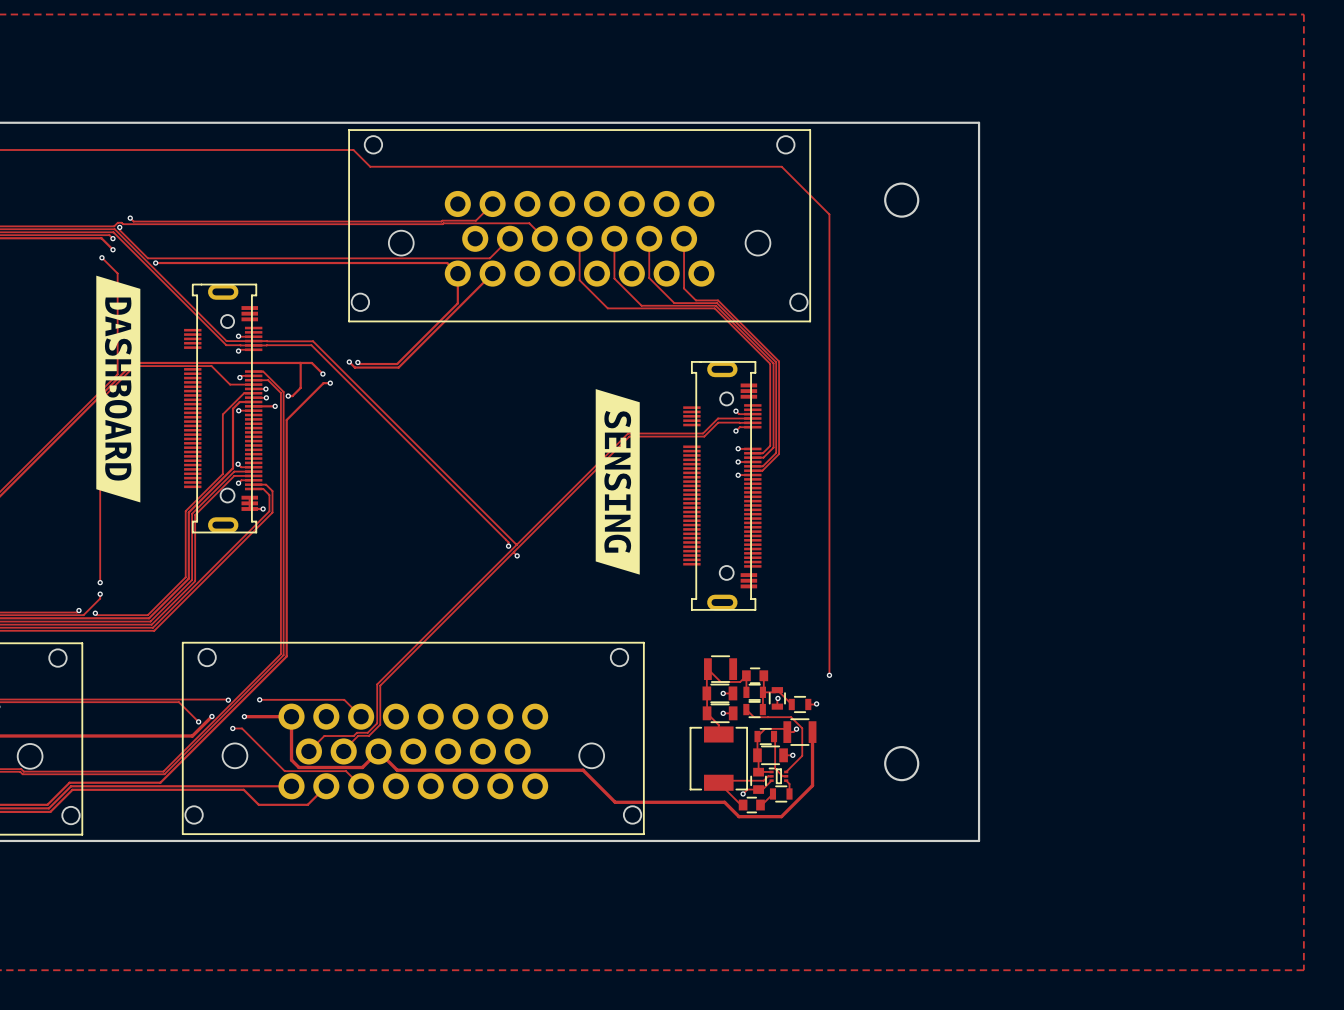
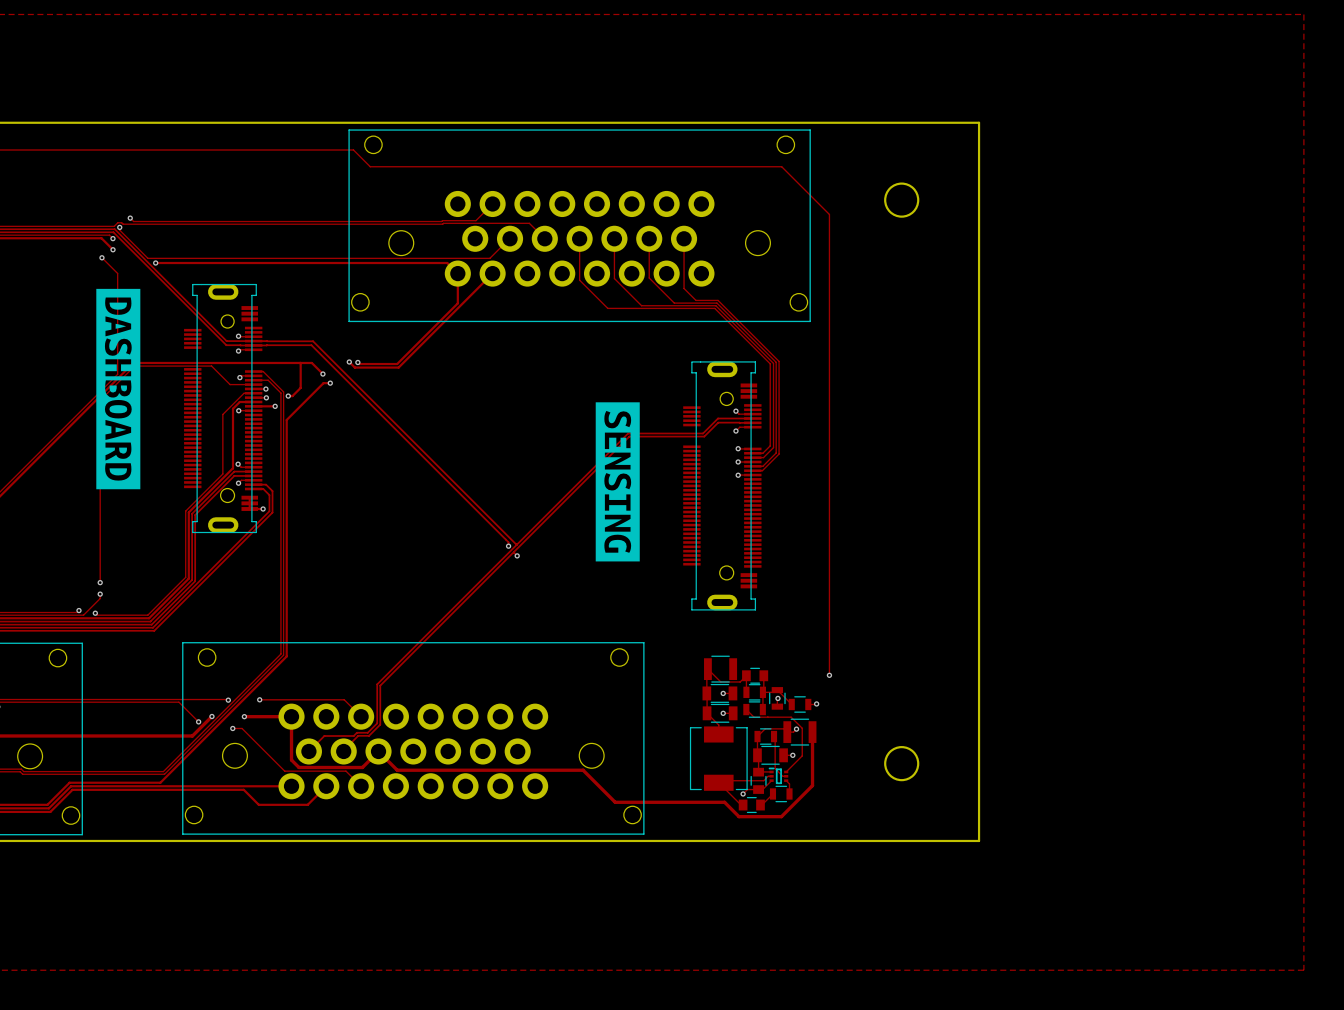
drawing shape: [96, 275, 141, 503] -> [96, 288, 141, 490]
drawing shape: [595, 389, 640, 575] -> [595, 402, 640, 562]

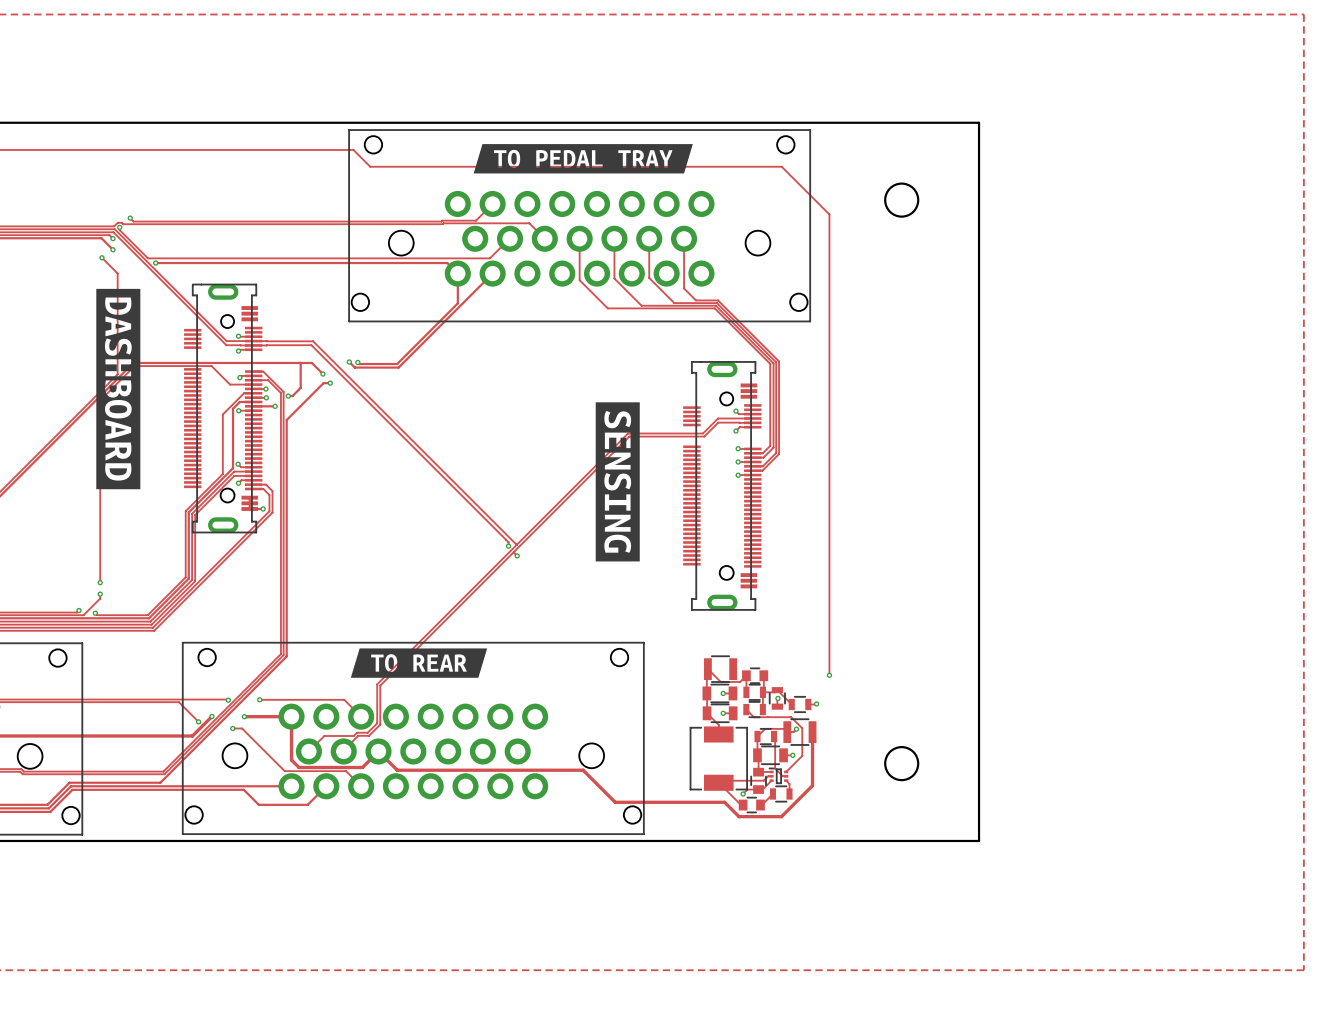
drawing: none -> [473, 144, 693, 174]
drawing: none -> [350, 648, 488, 678]

